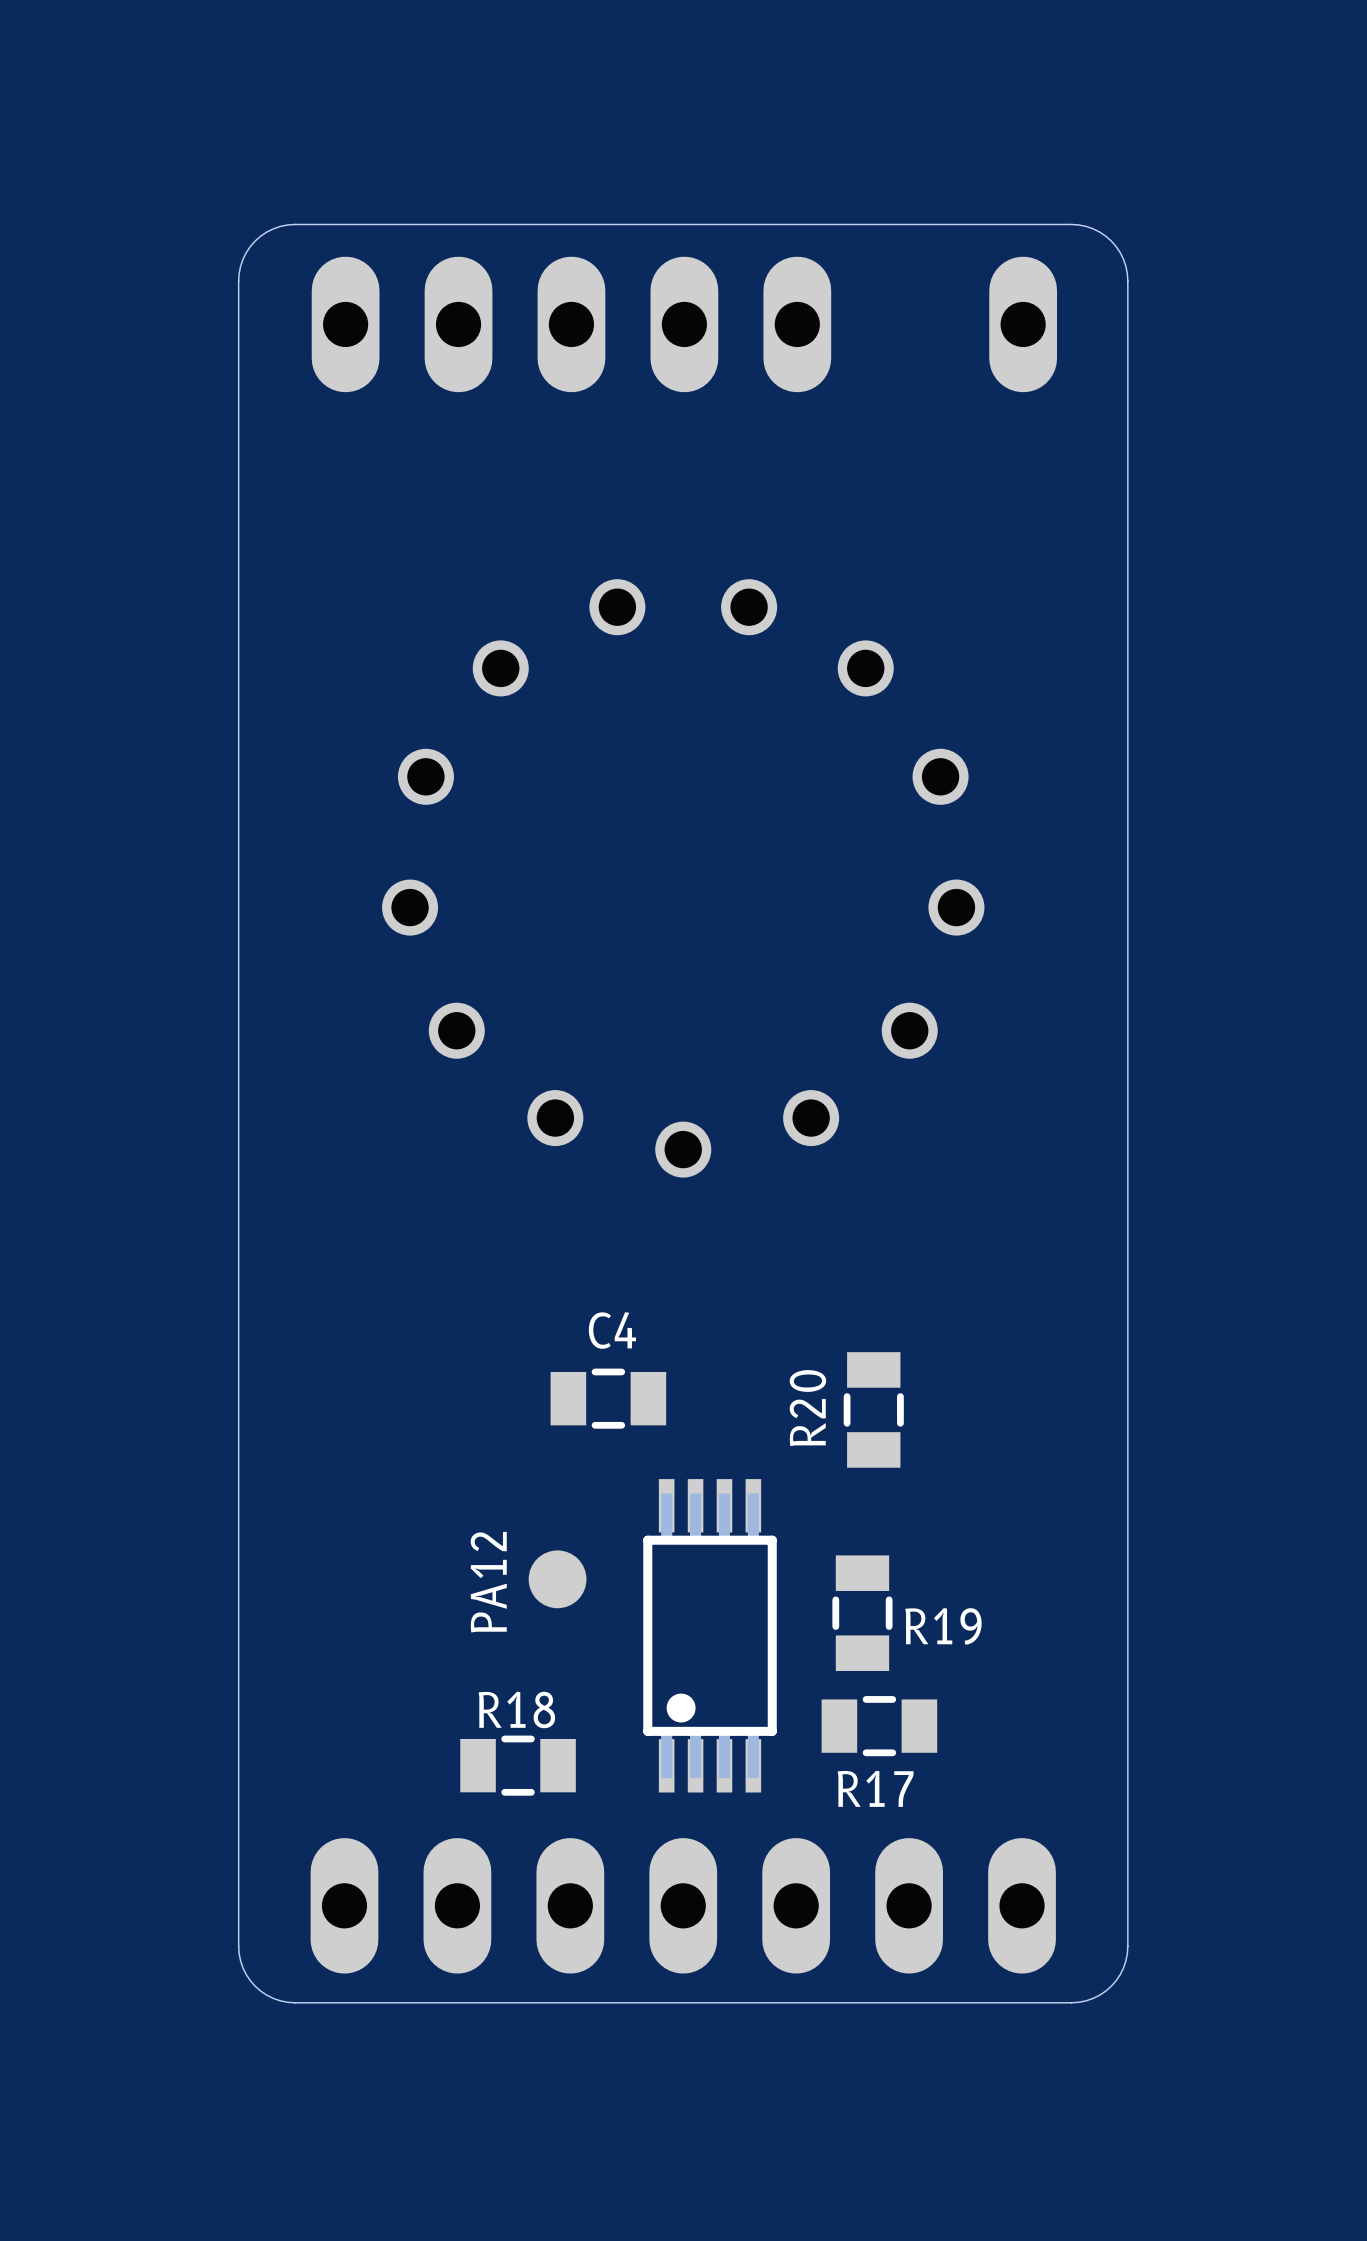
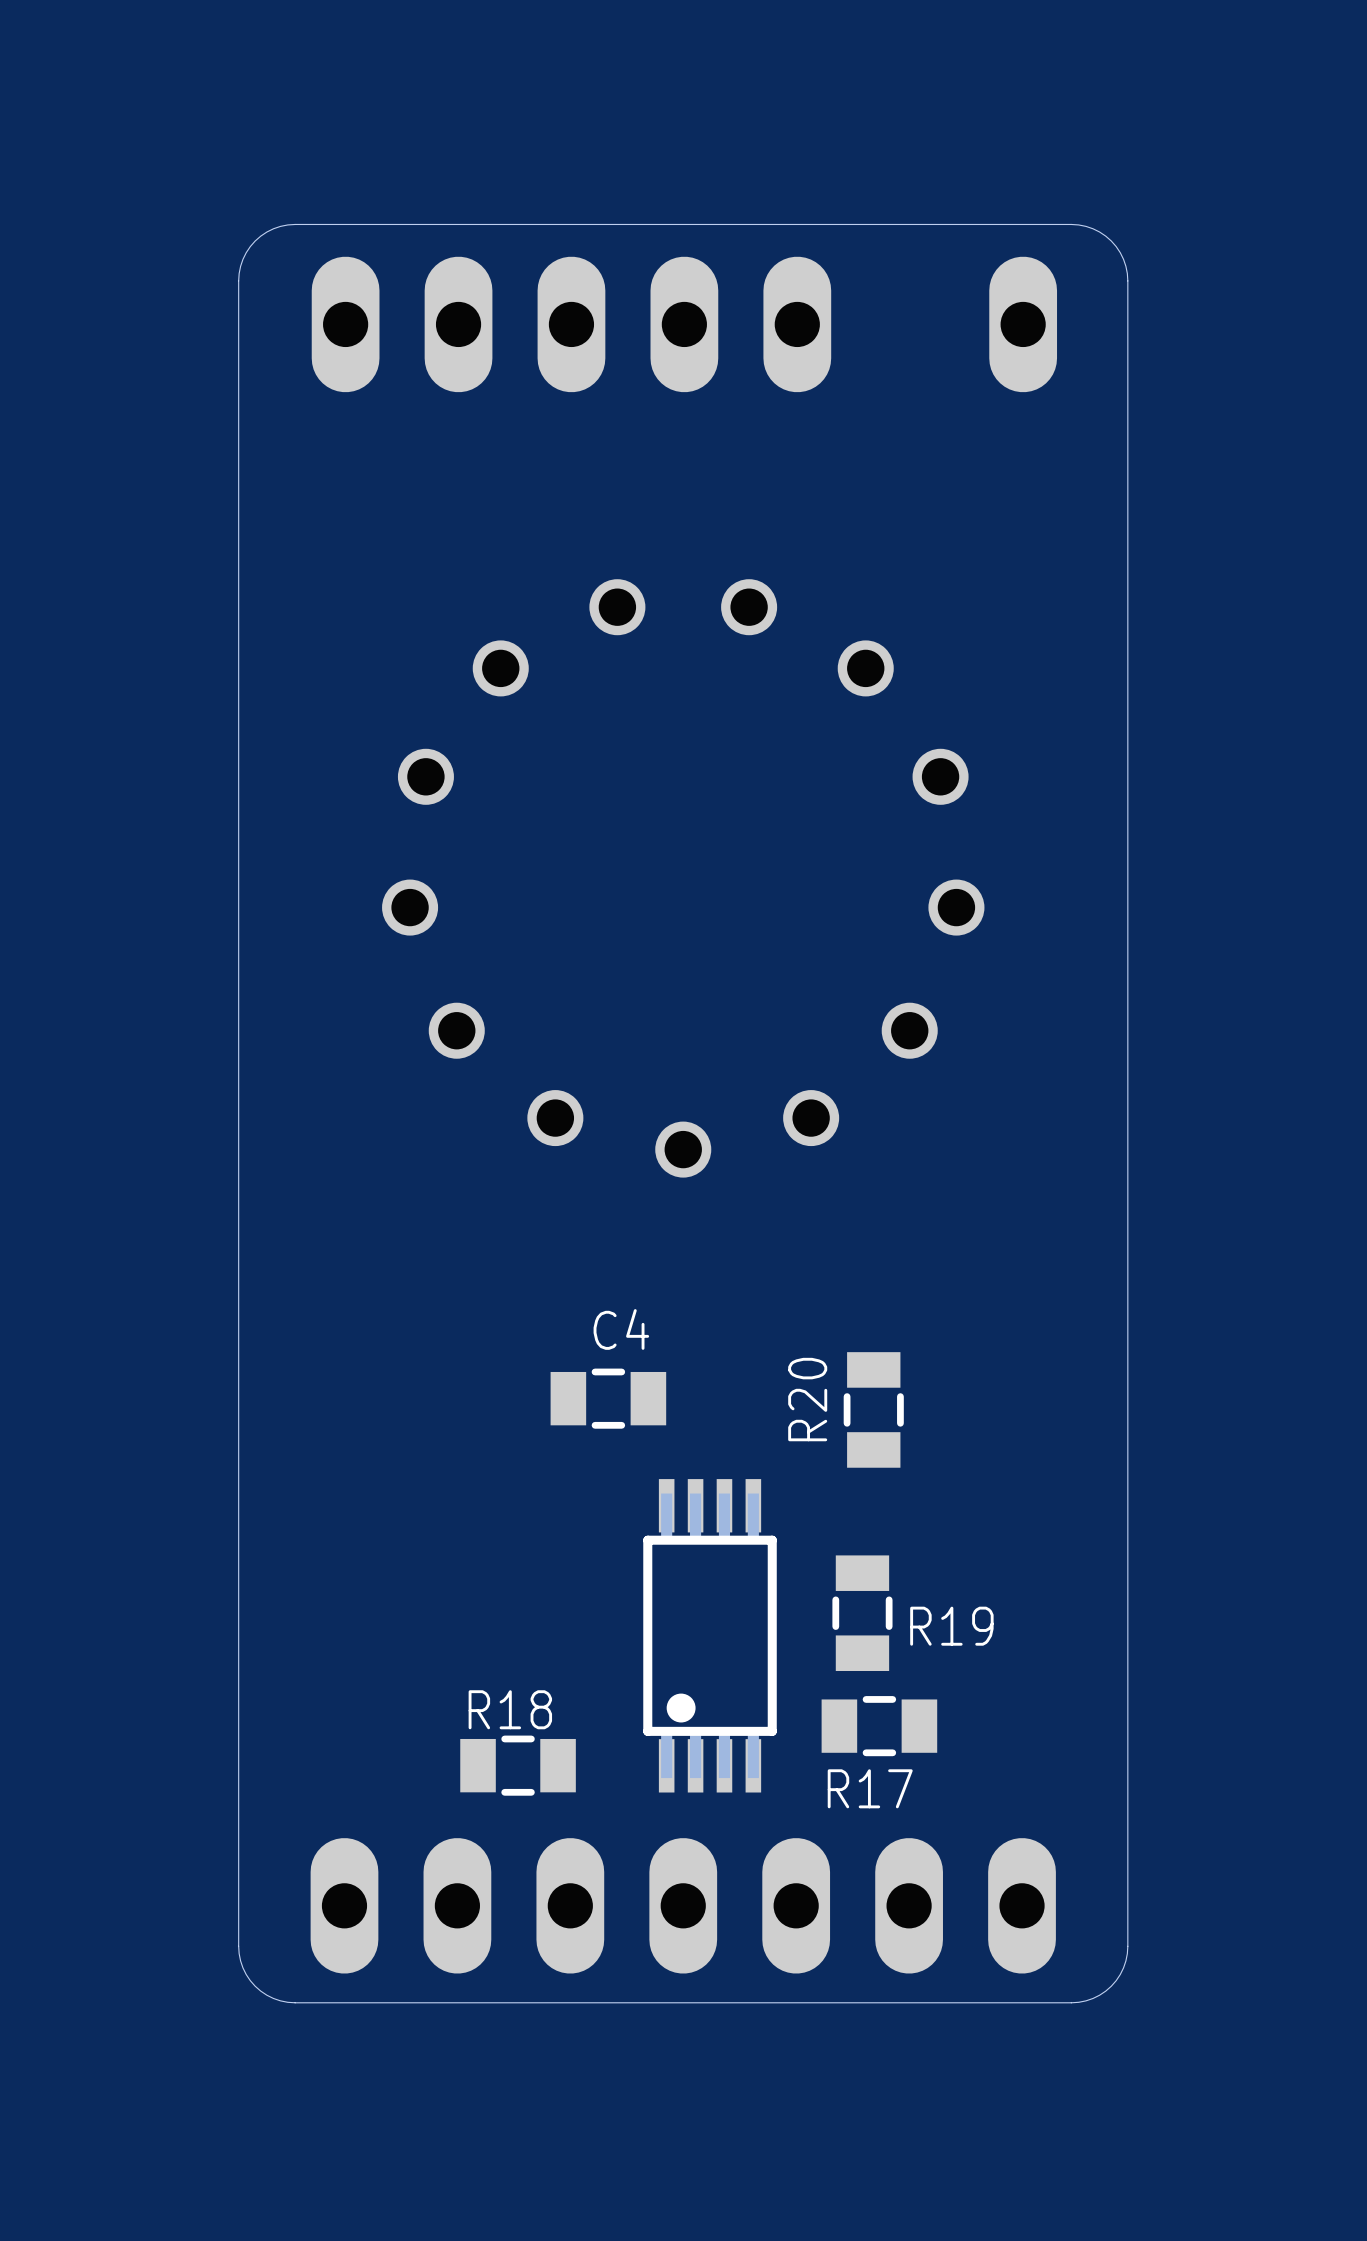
part: (557, 1579) -> none
text: PA12 (488, 1582) -> none

